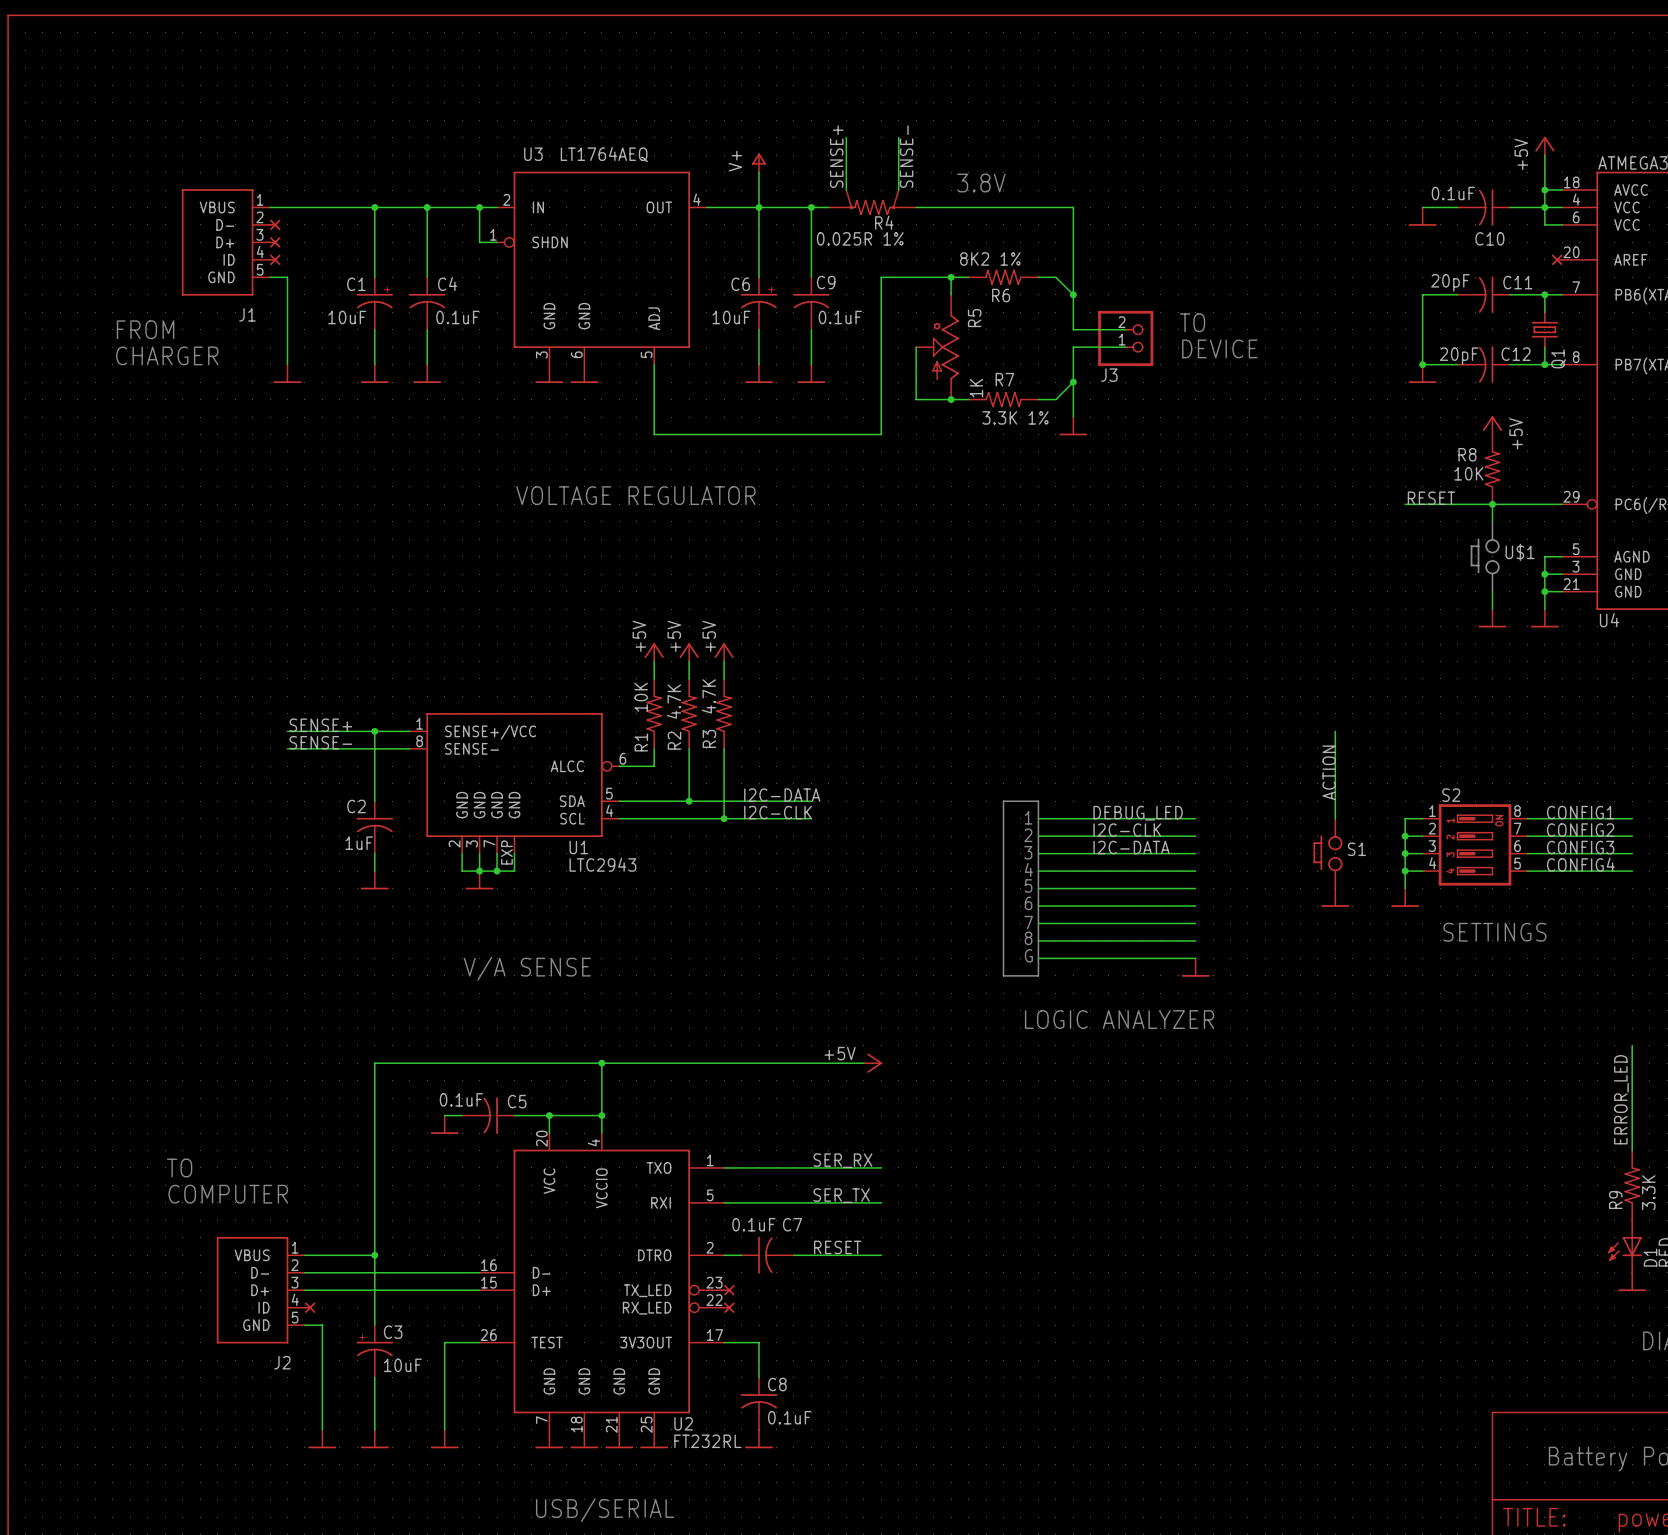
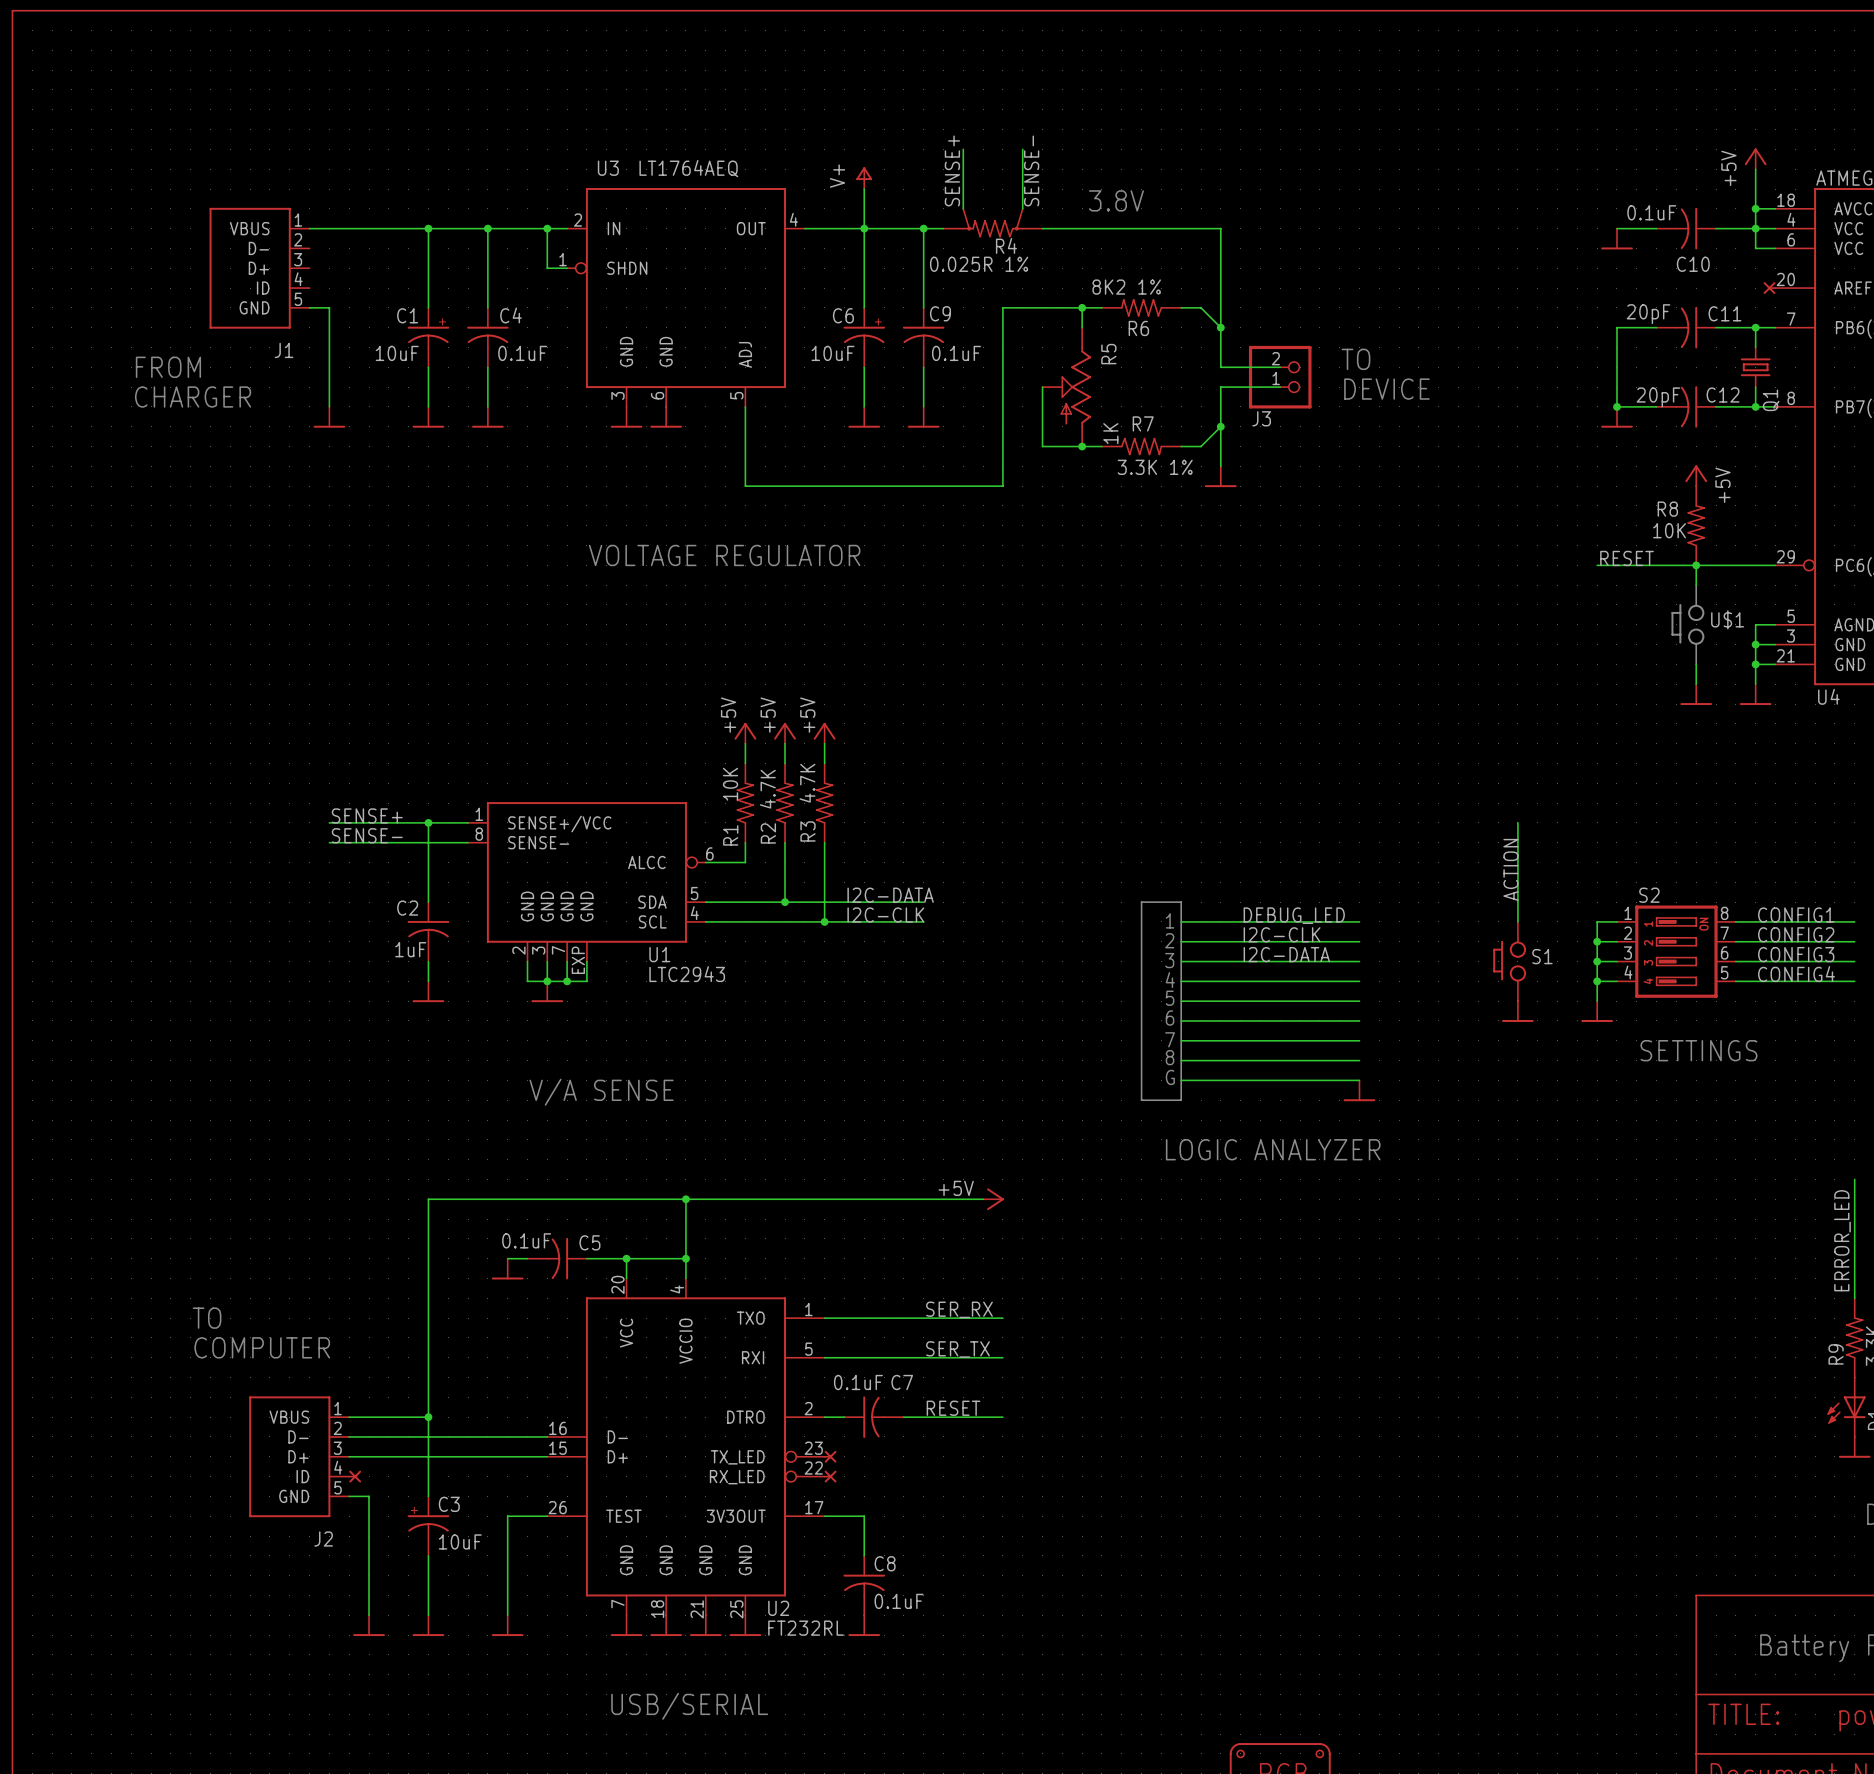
part: (274, 224) -> none
part: (274, 242) -> none
part: (274, 259) -> none
R5 symbol: [916, 294, 959, 400] -> [1042, 327, 1092, 447]

